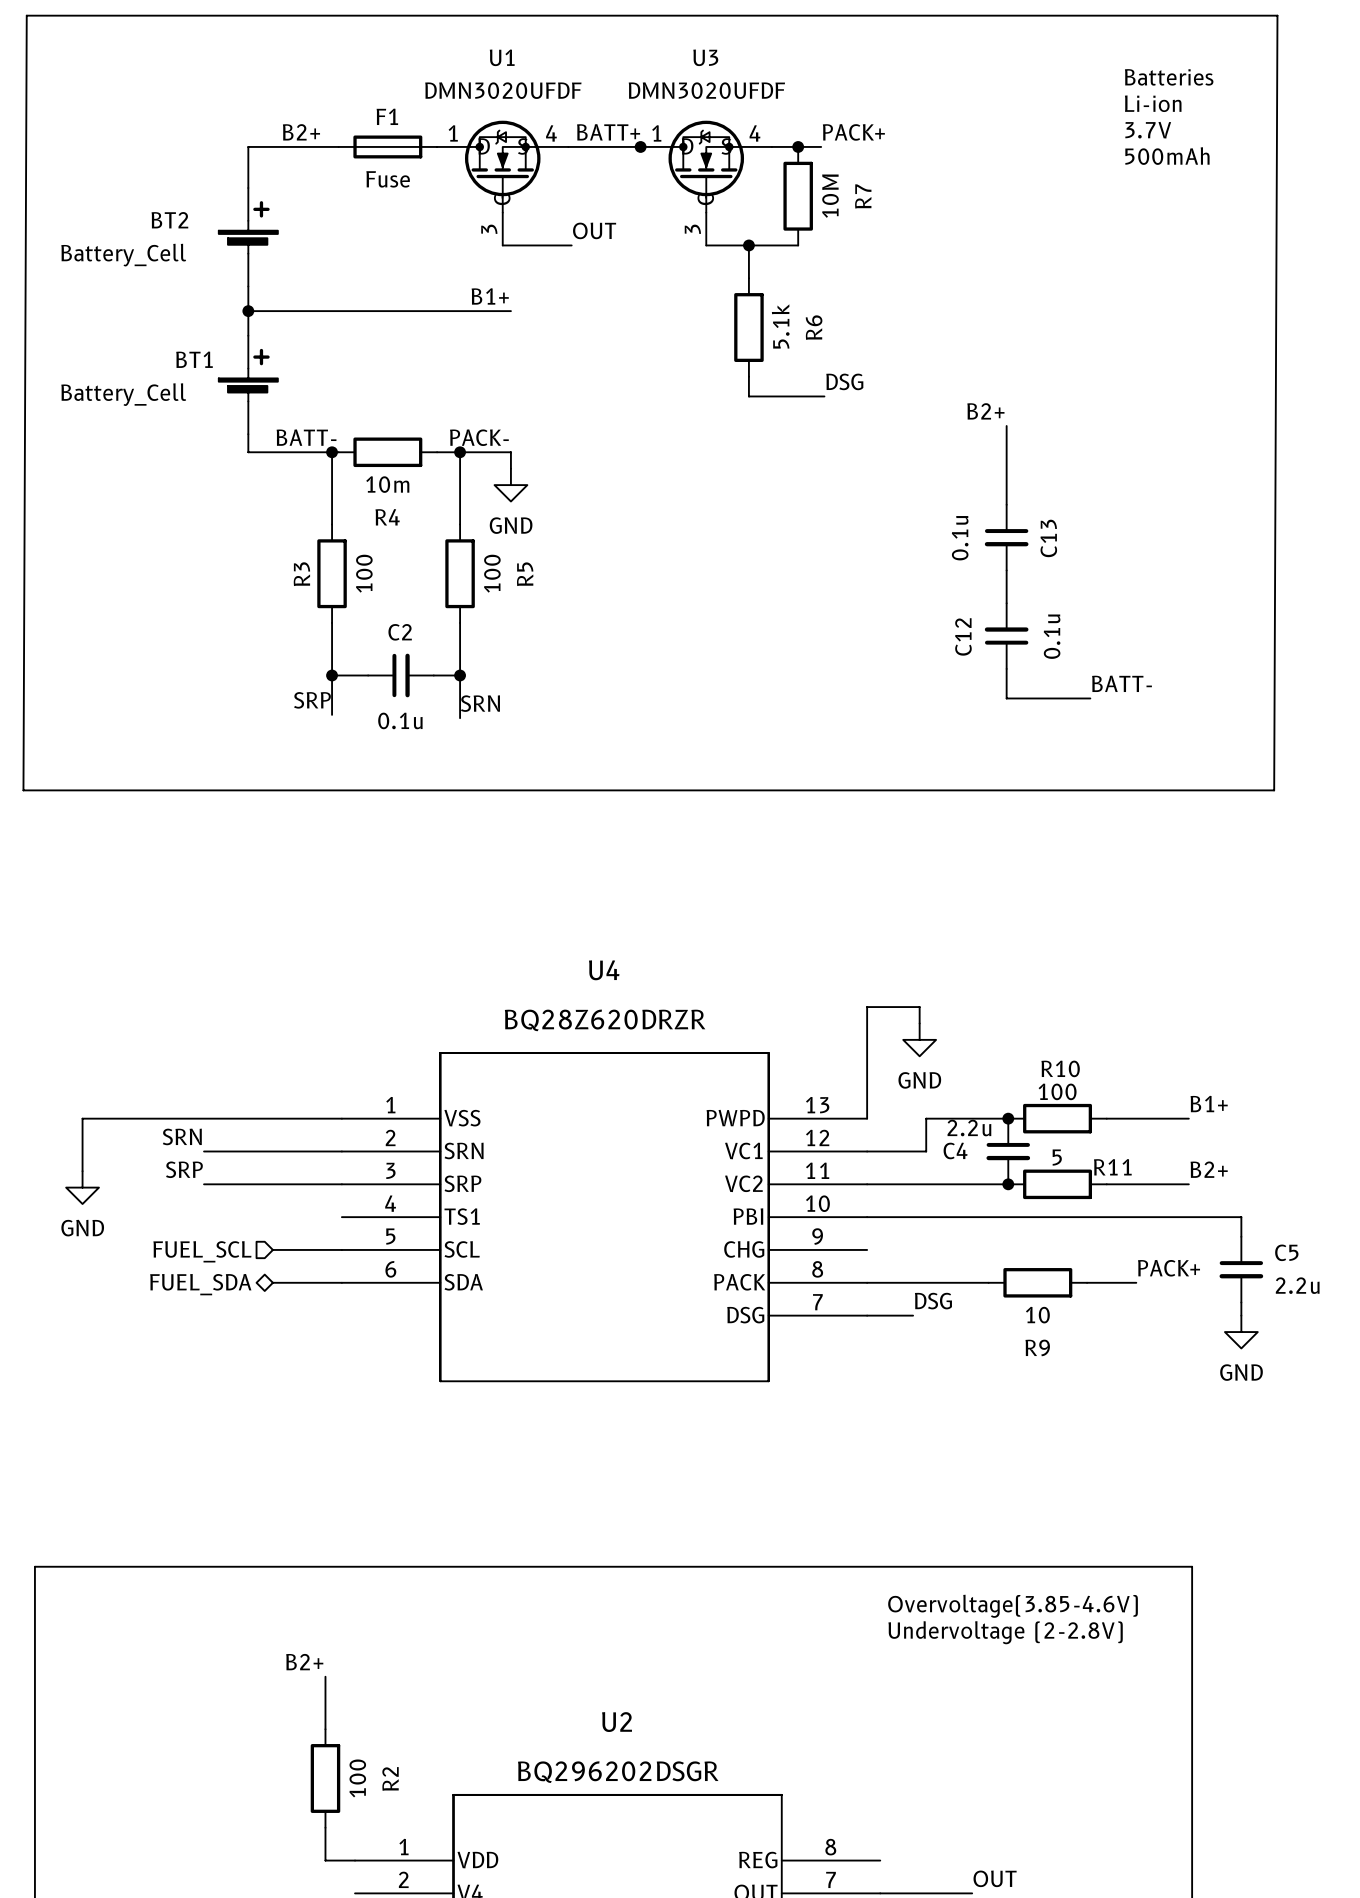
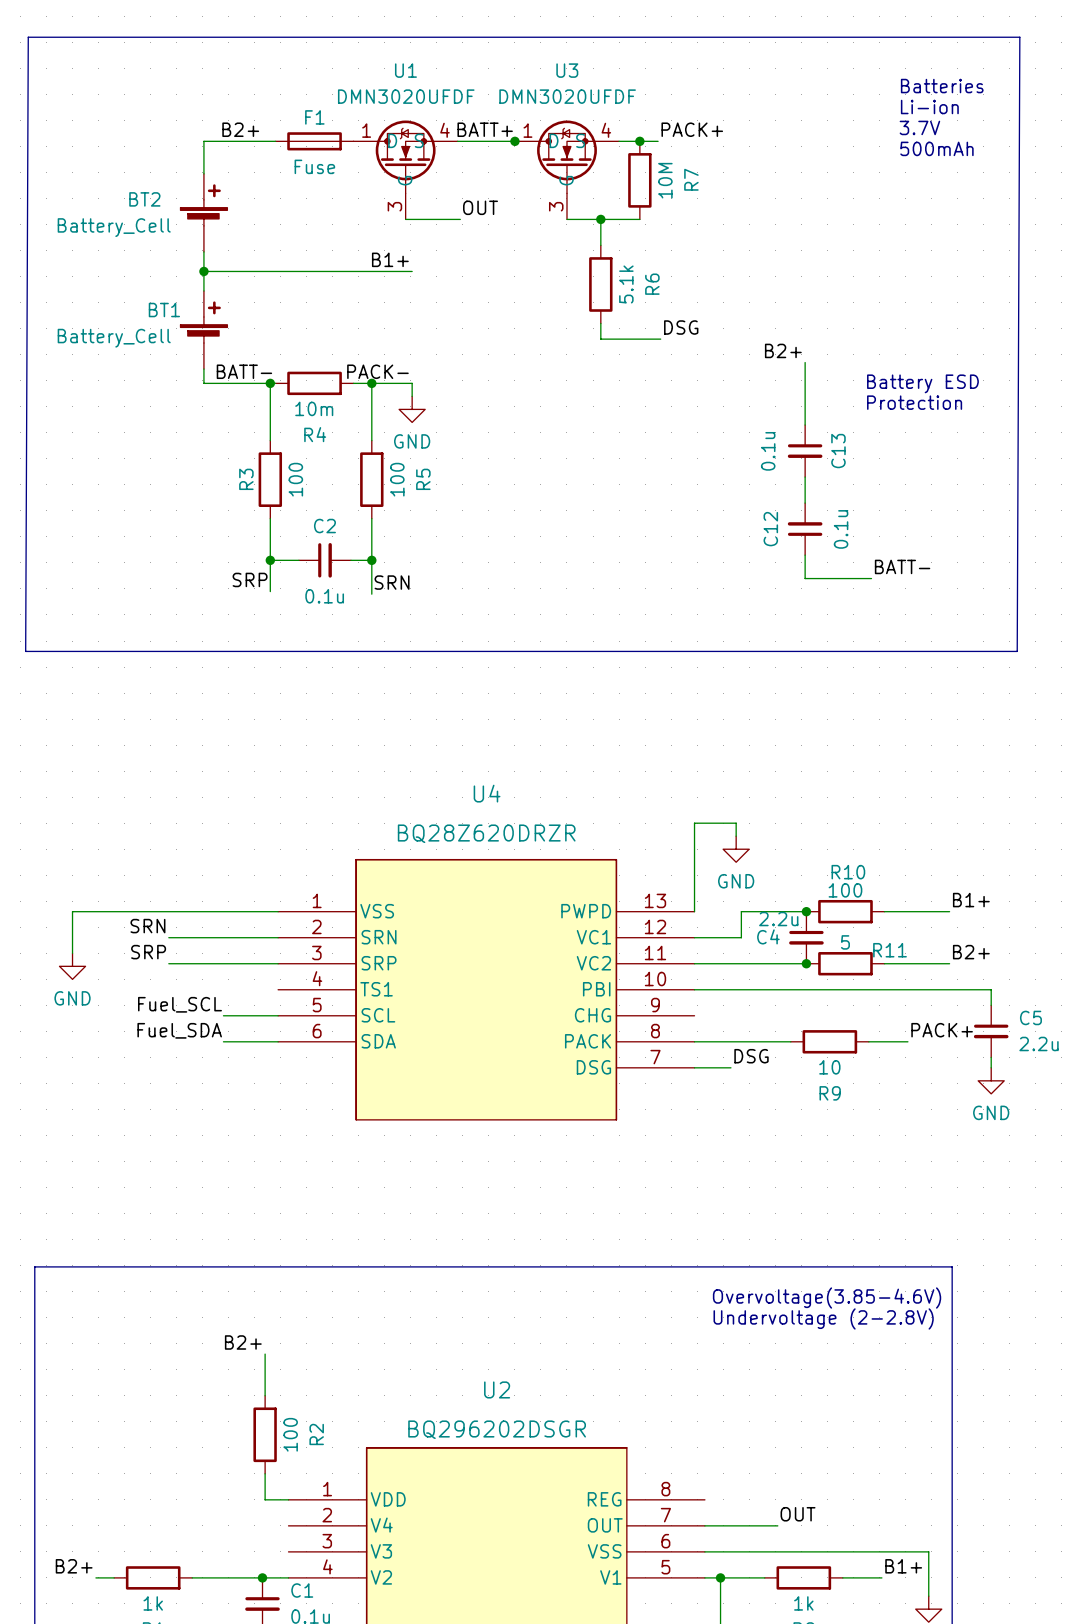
text: none -> Battery ESD (922, 383)
text: none -> Protection (914, 402)
label: none -> Fuel_SCL (179, 1004)
hierarchical label: FUEL_SCL (202, 1251) -> none
label: none -> Fuel_SDA (179, 1030)
hierarchical label: FUEL_SDA (200, 1284) -> none

